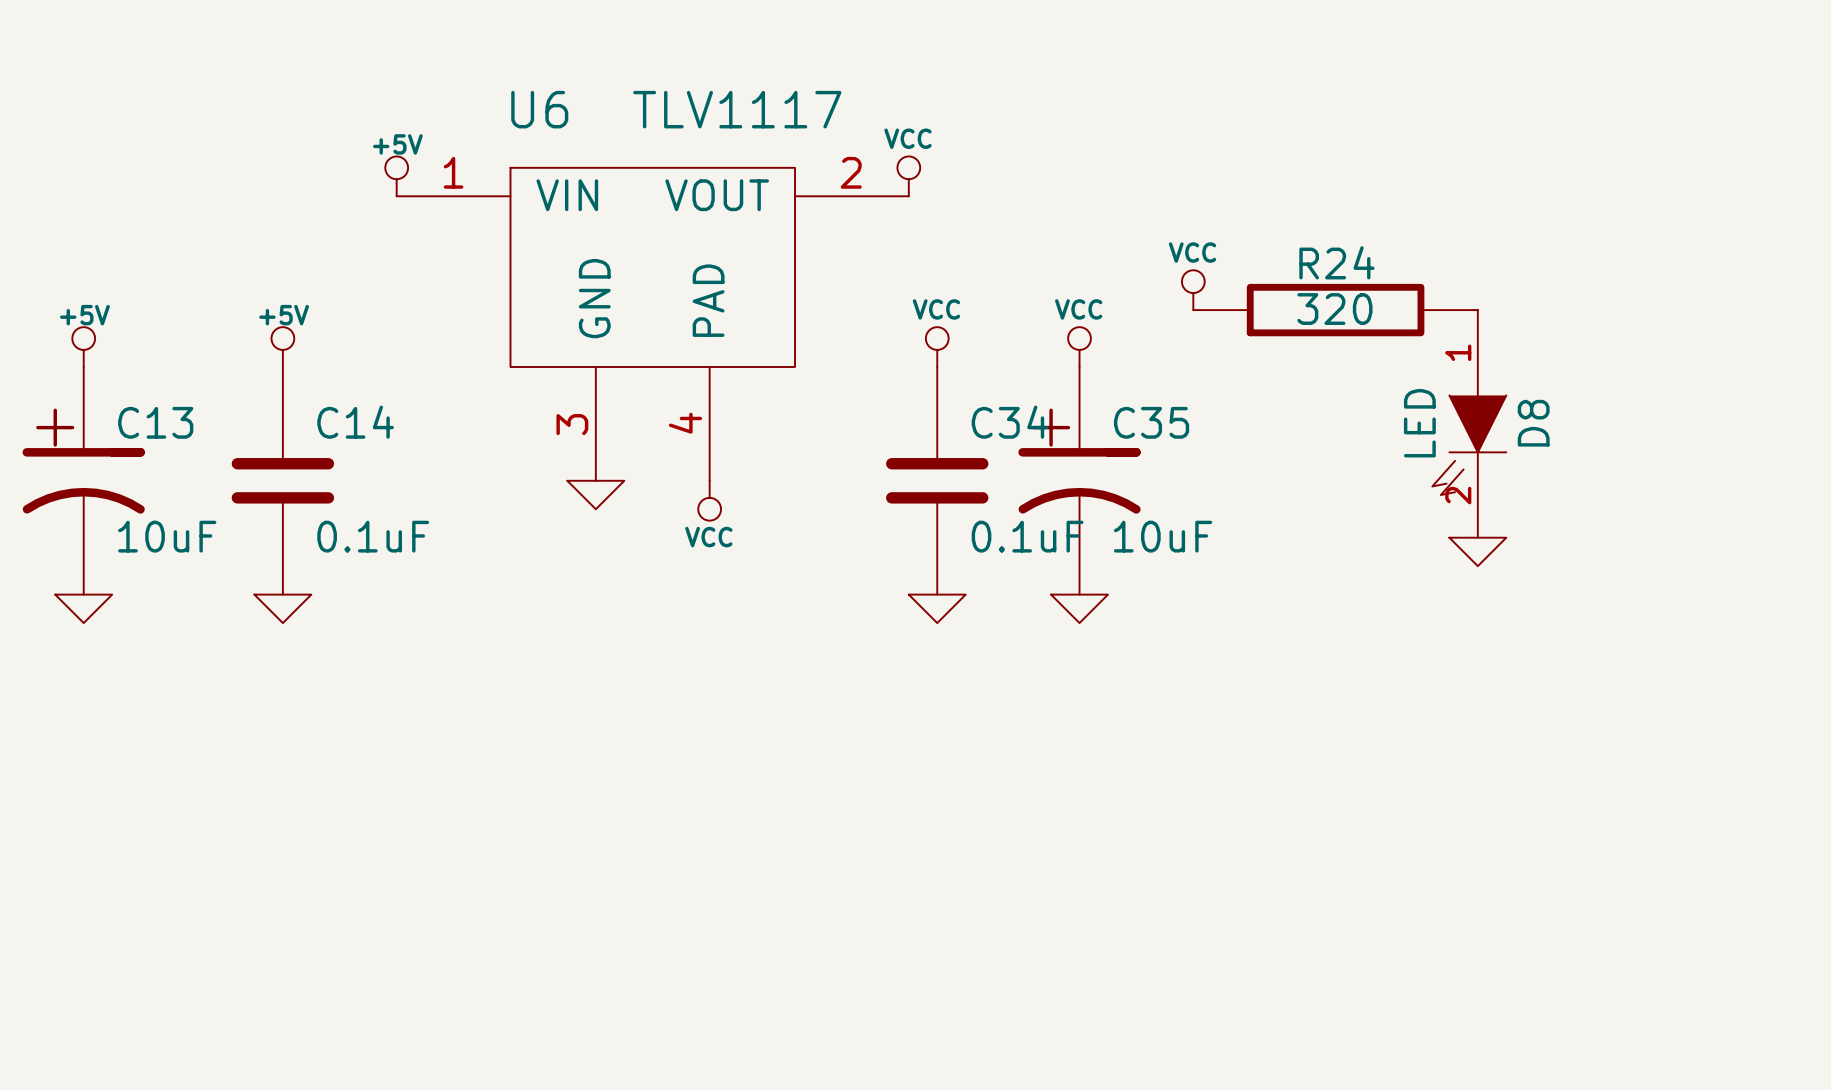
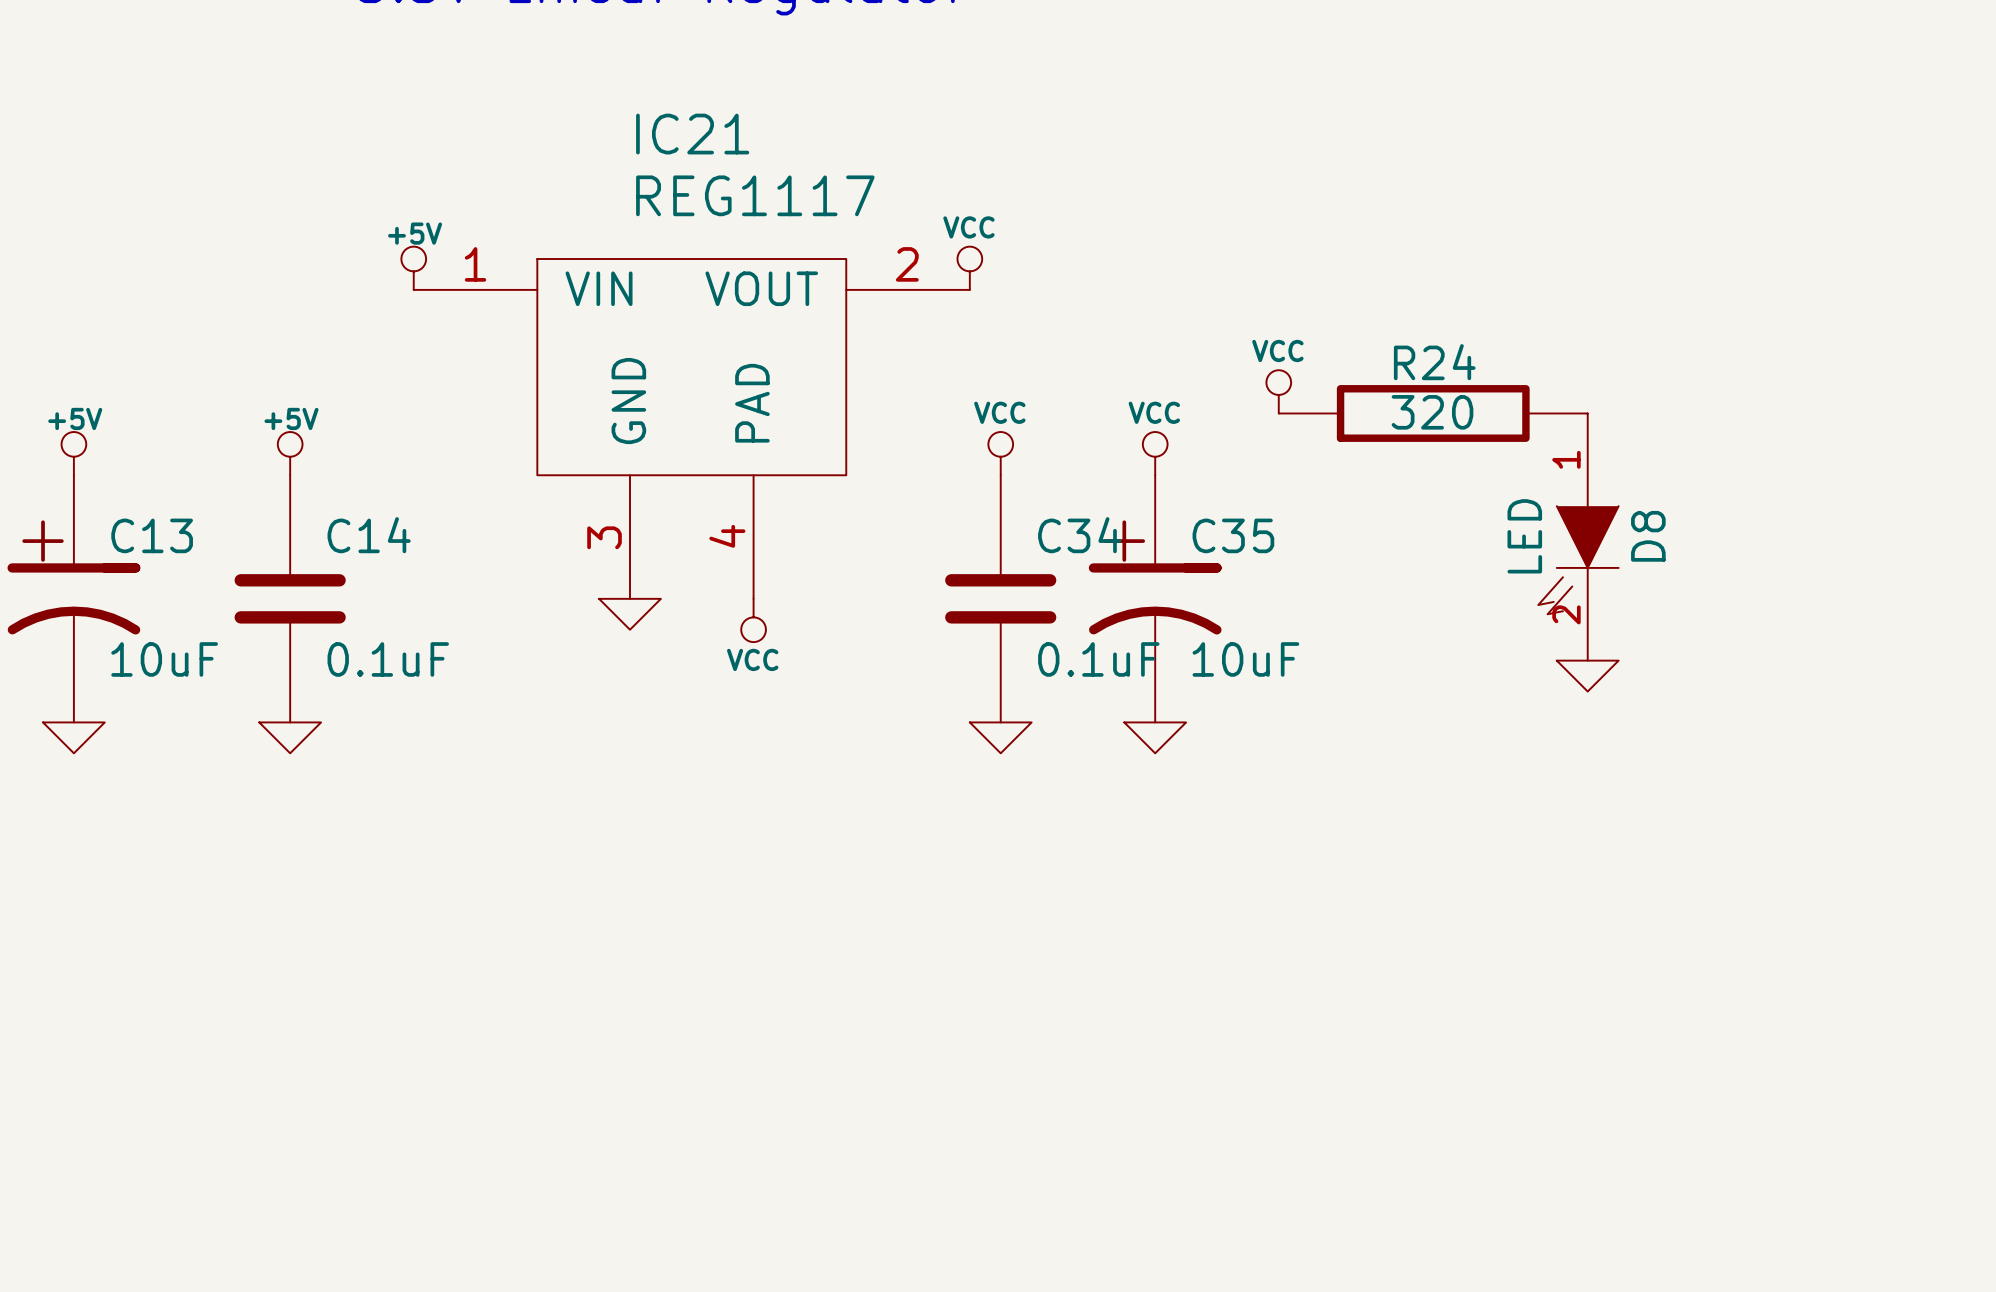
U6 name: U6 (539, 109) -> IC21 (692, 134)
U6 value: TLV1117 (737, 109) -> REG1117 (755, 195)

